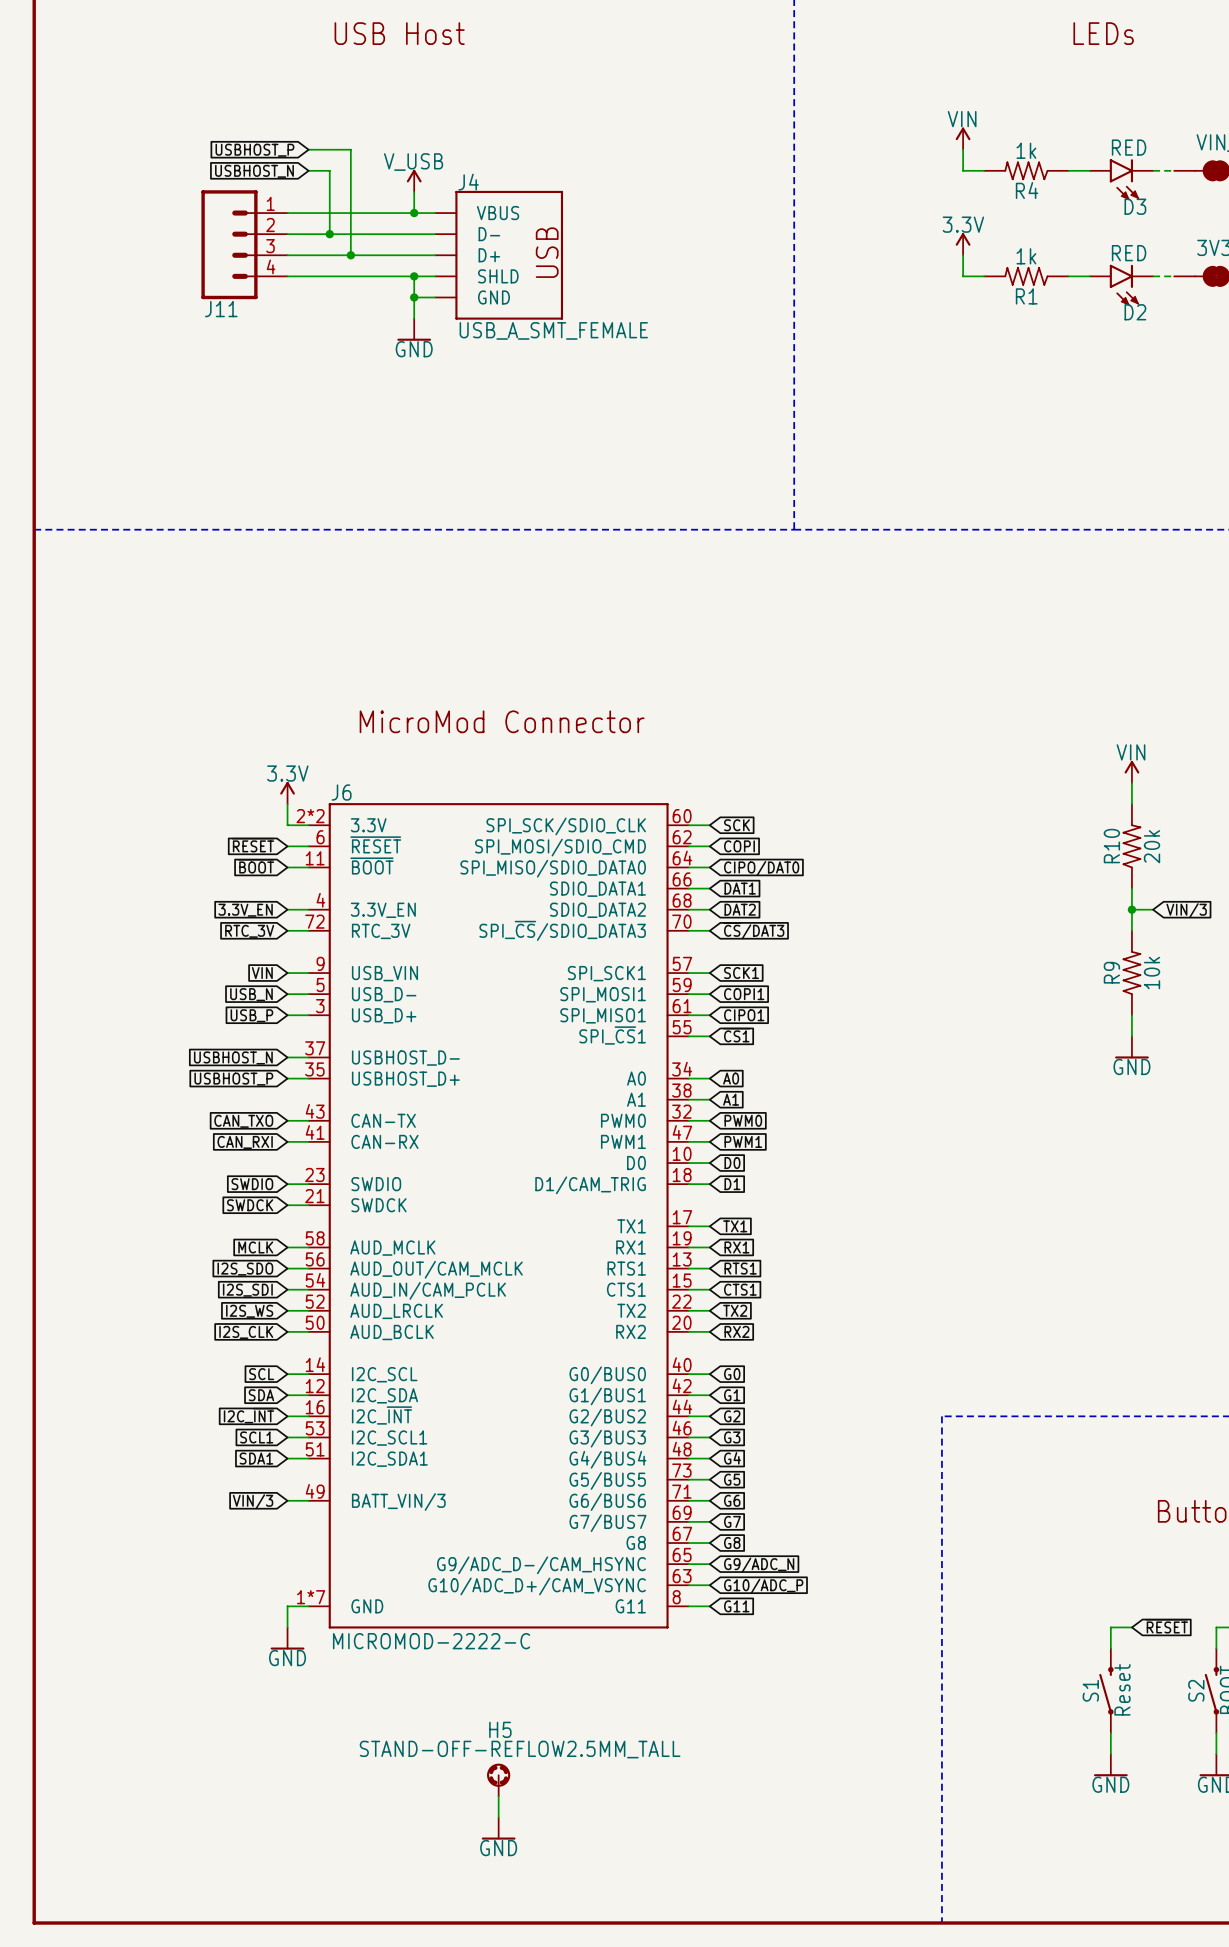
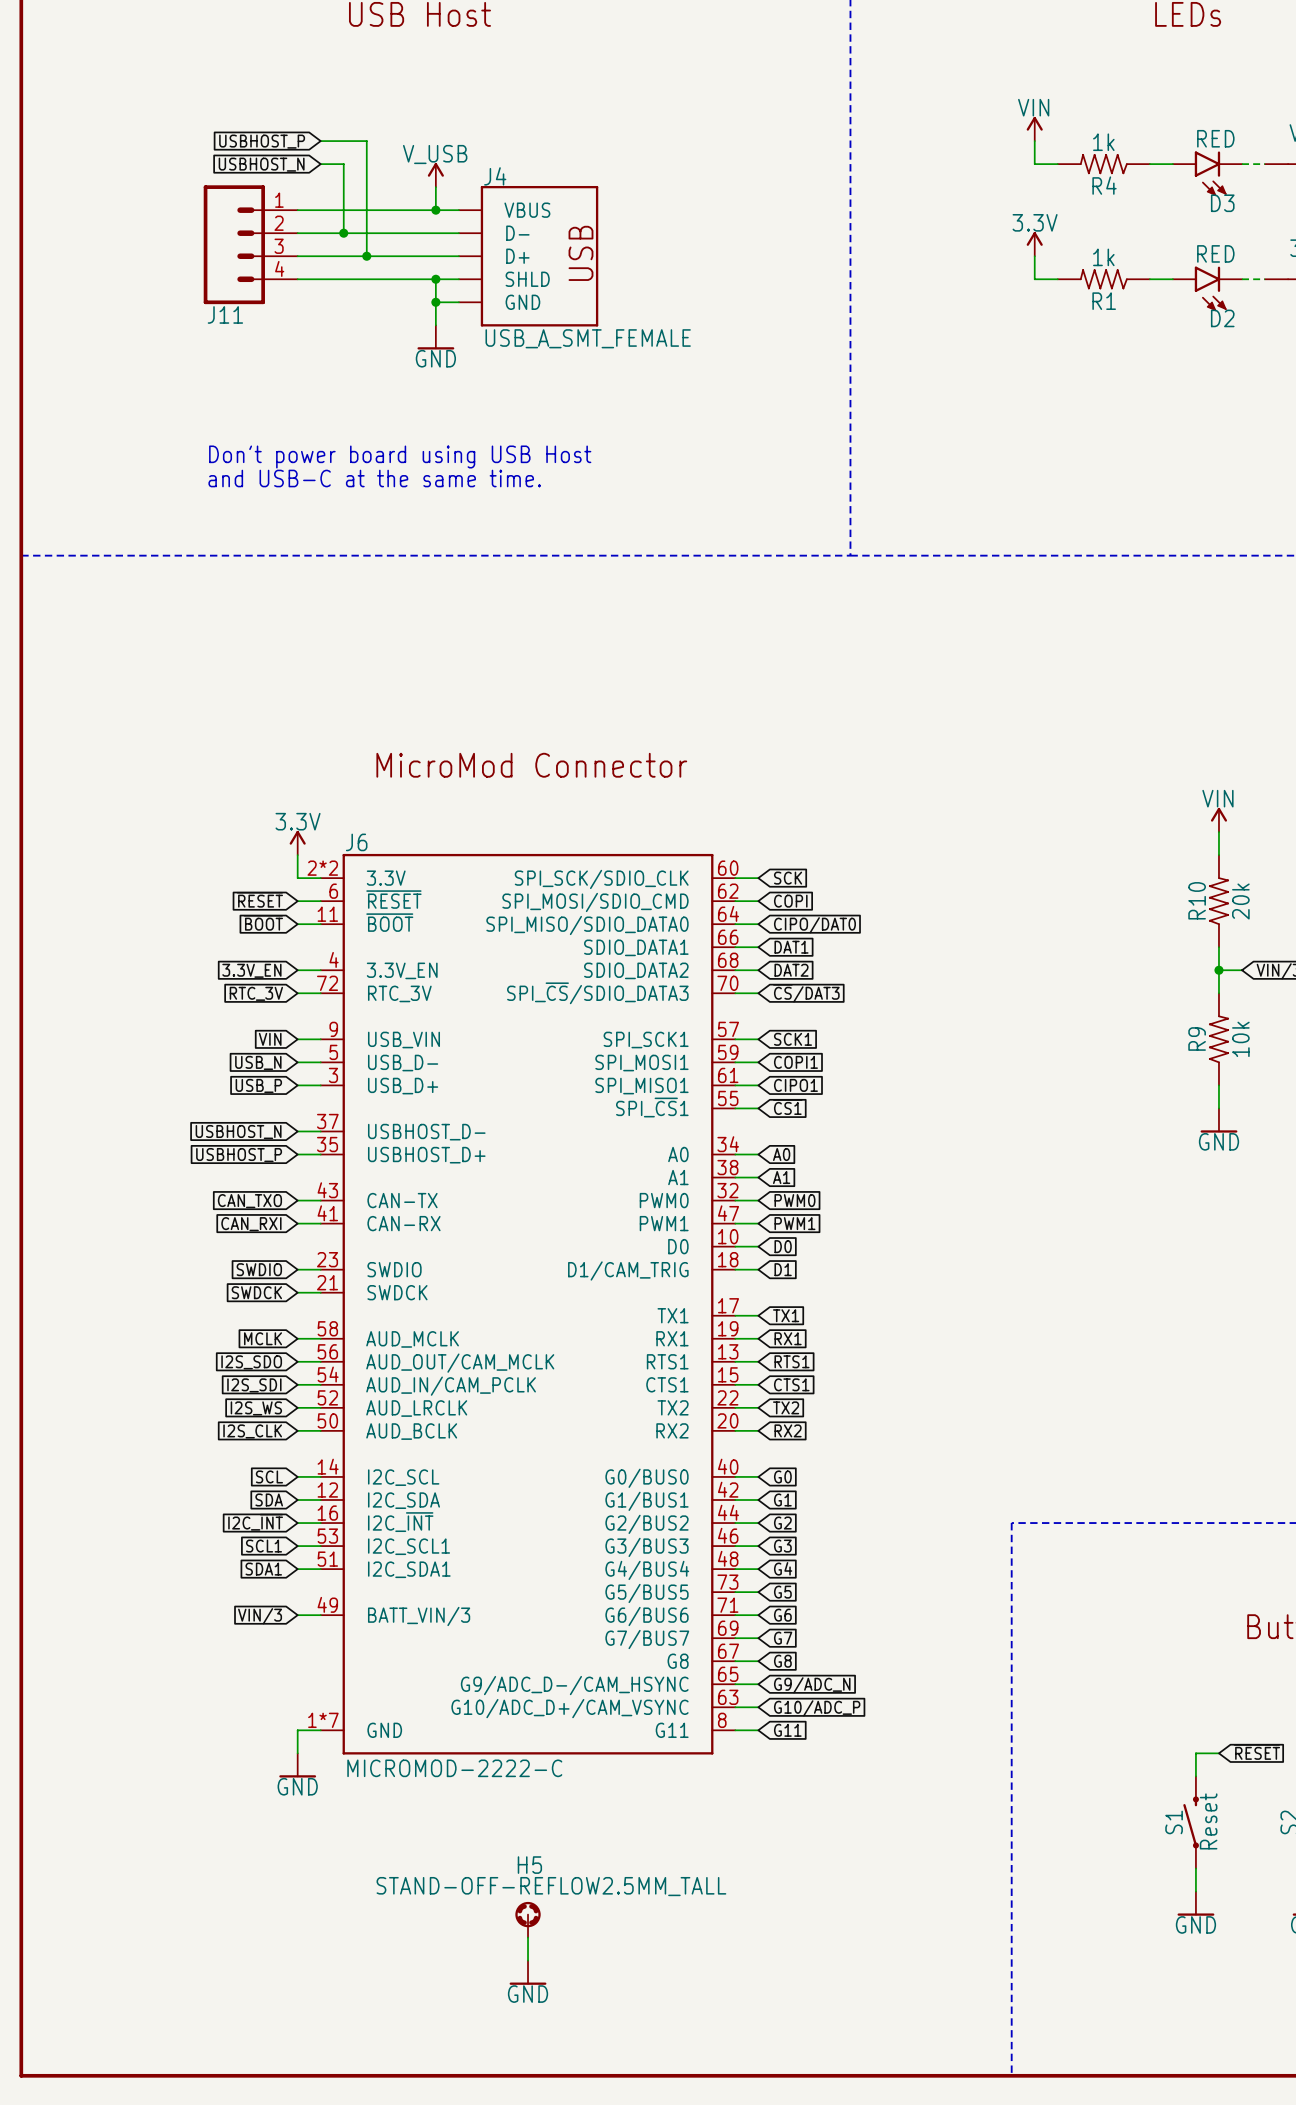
text: none -> Don't power board using USB Host (400, 457)
text: none -> and USB-C at the same time. (374, 478)

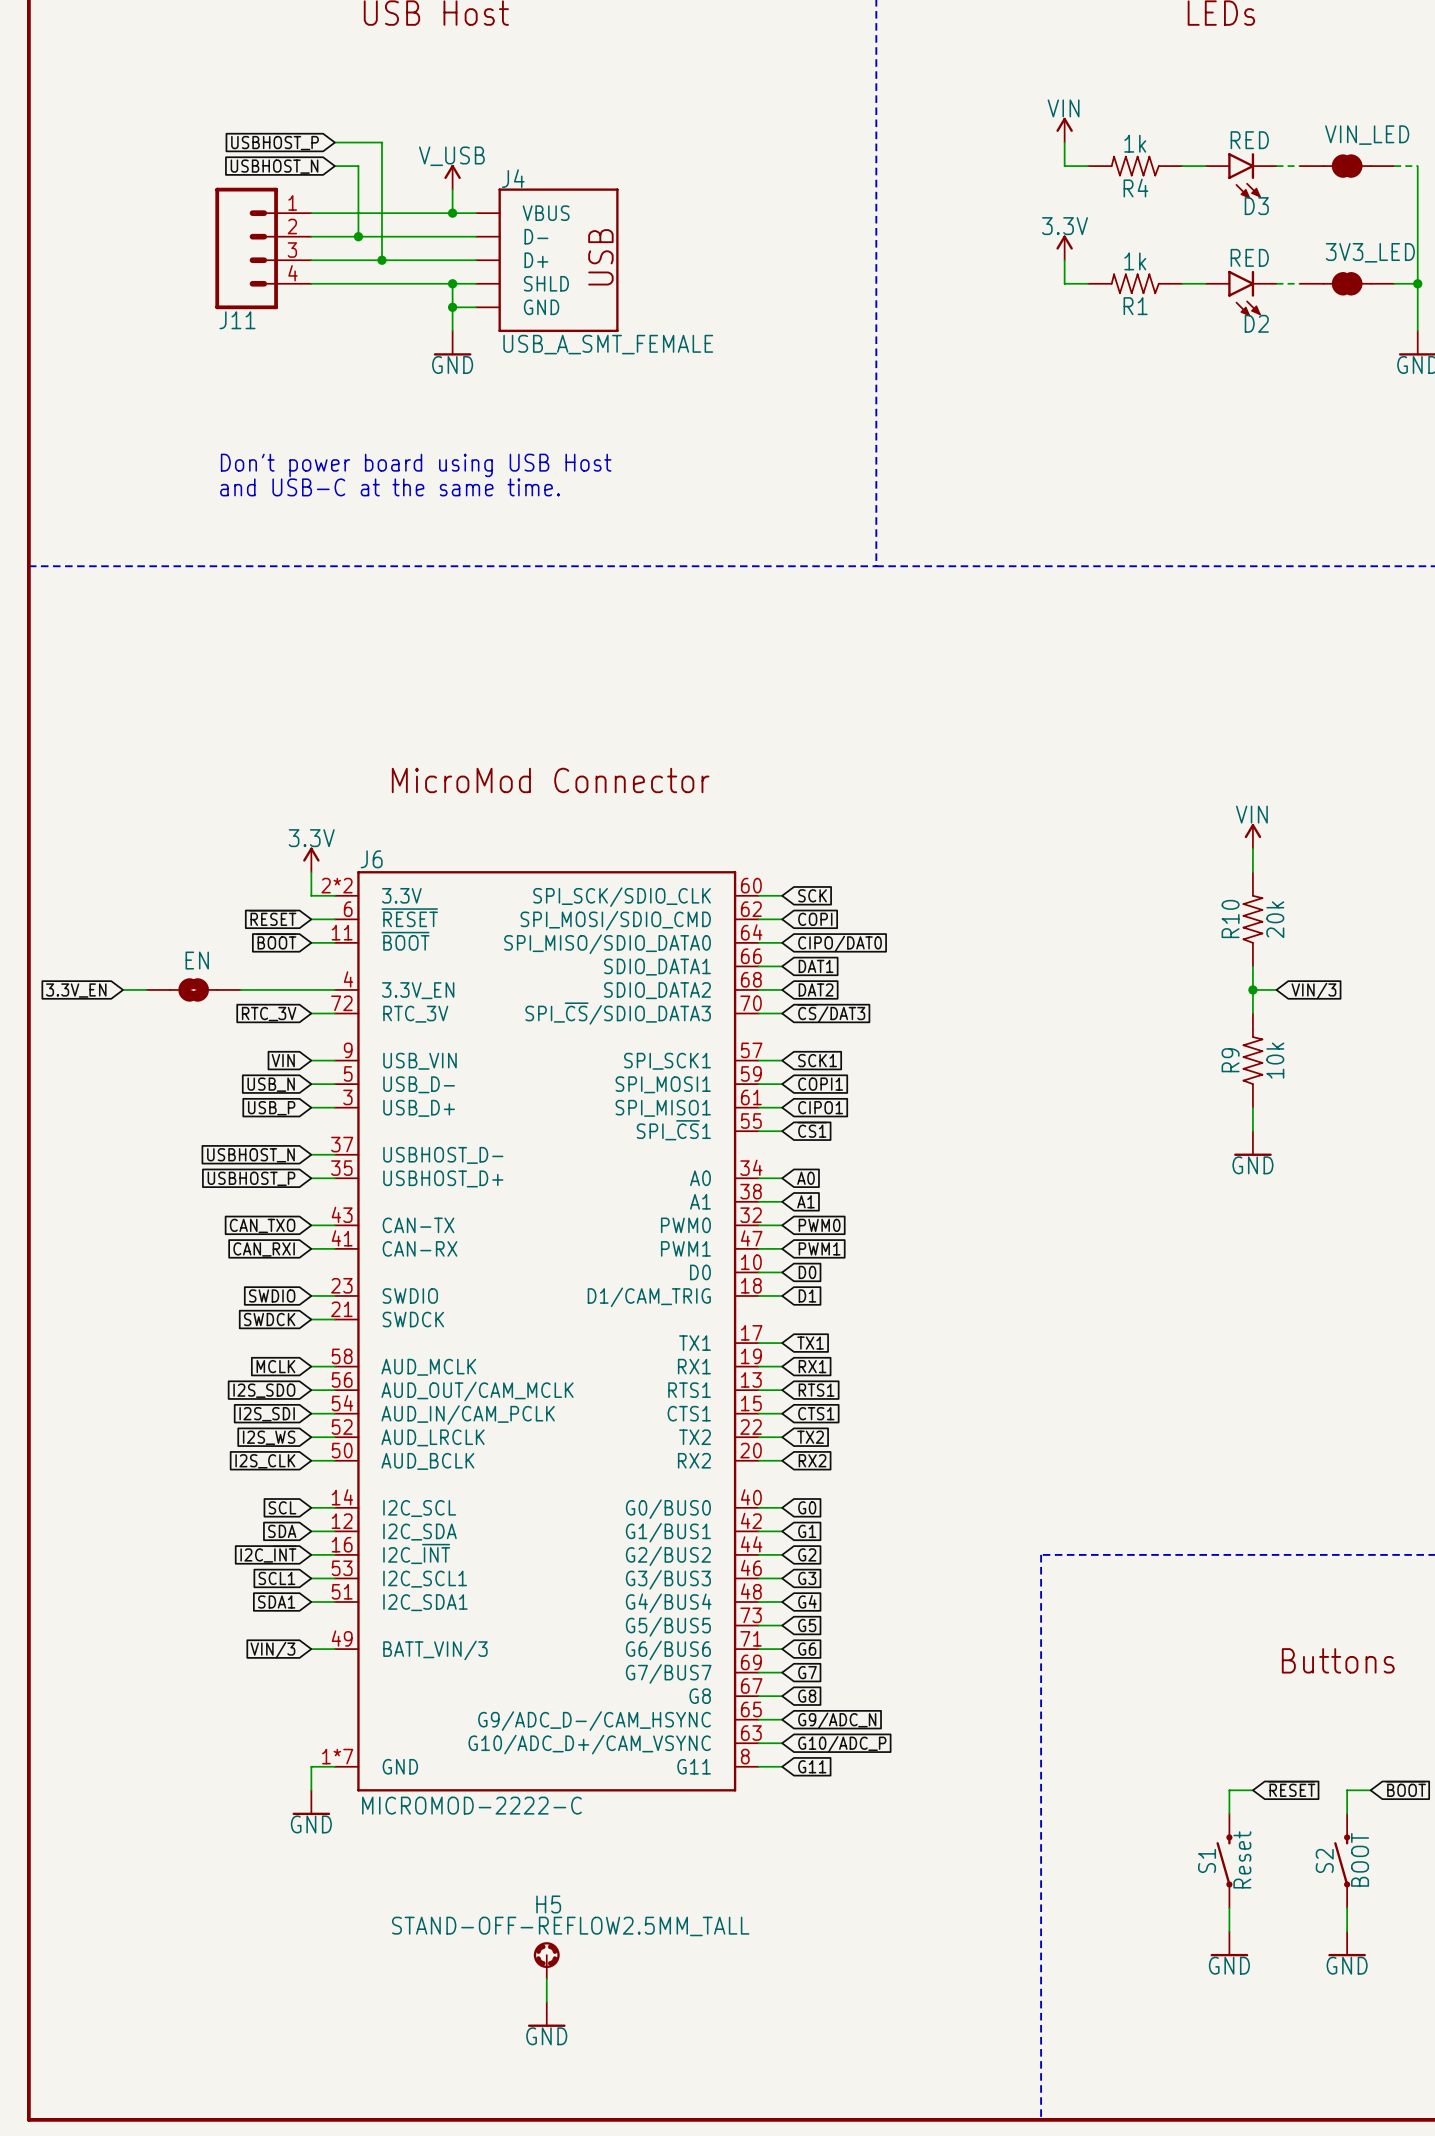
wire: none -> (123, 989) (146, 989)
EN: none -> (193, 989)
wire: none -> (240, 989) (311, 989)
global label position: 3.3V_EN (251, 970) -> 3.3V_EN (76, 990)

